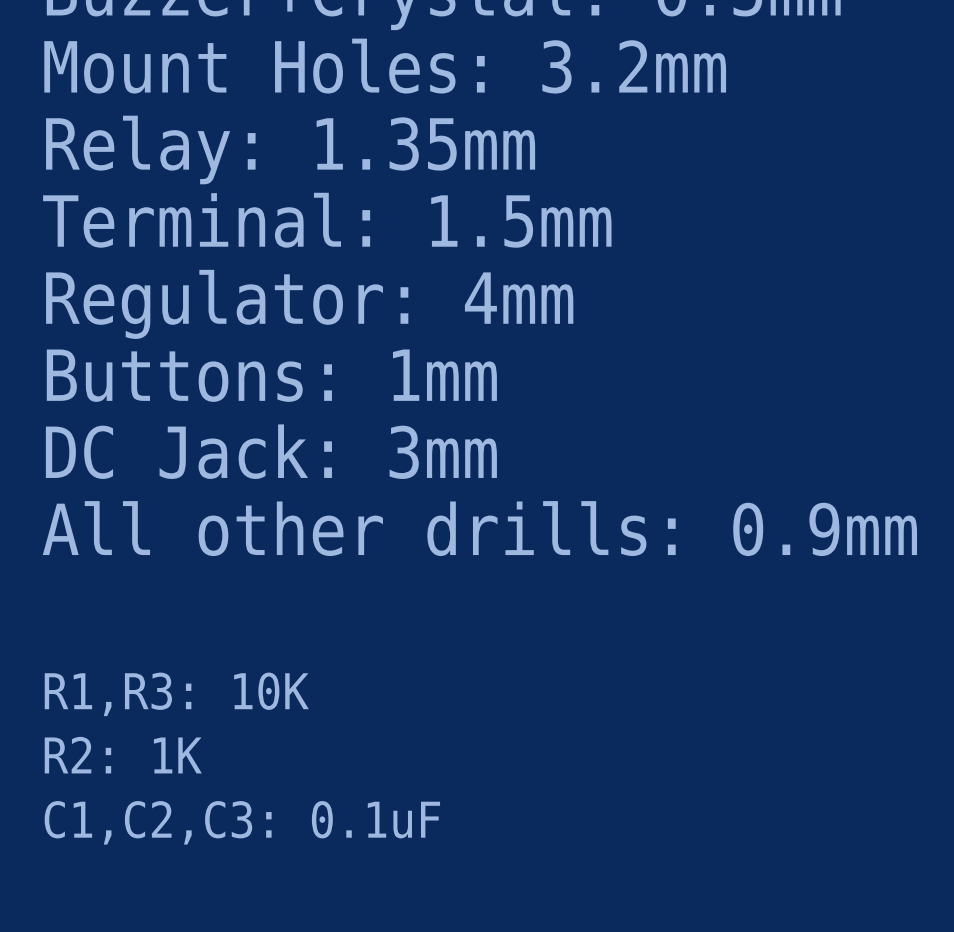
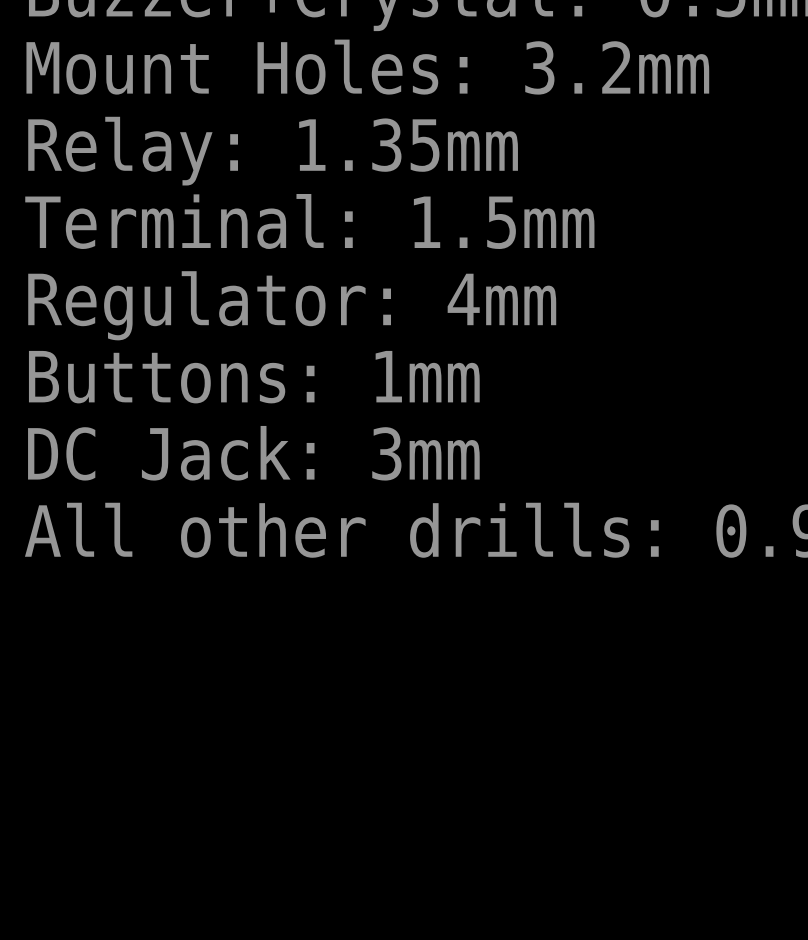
text: R1,R3: 10K (176, 694) -> none
text: R2: 1K (123, 755) -> none
text: C1,C2,C3: 0.1uF (242, 822) -> none

